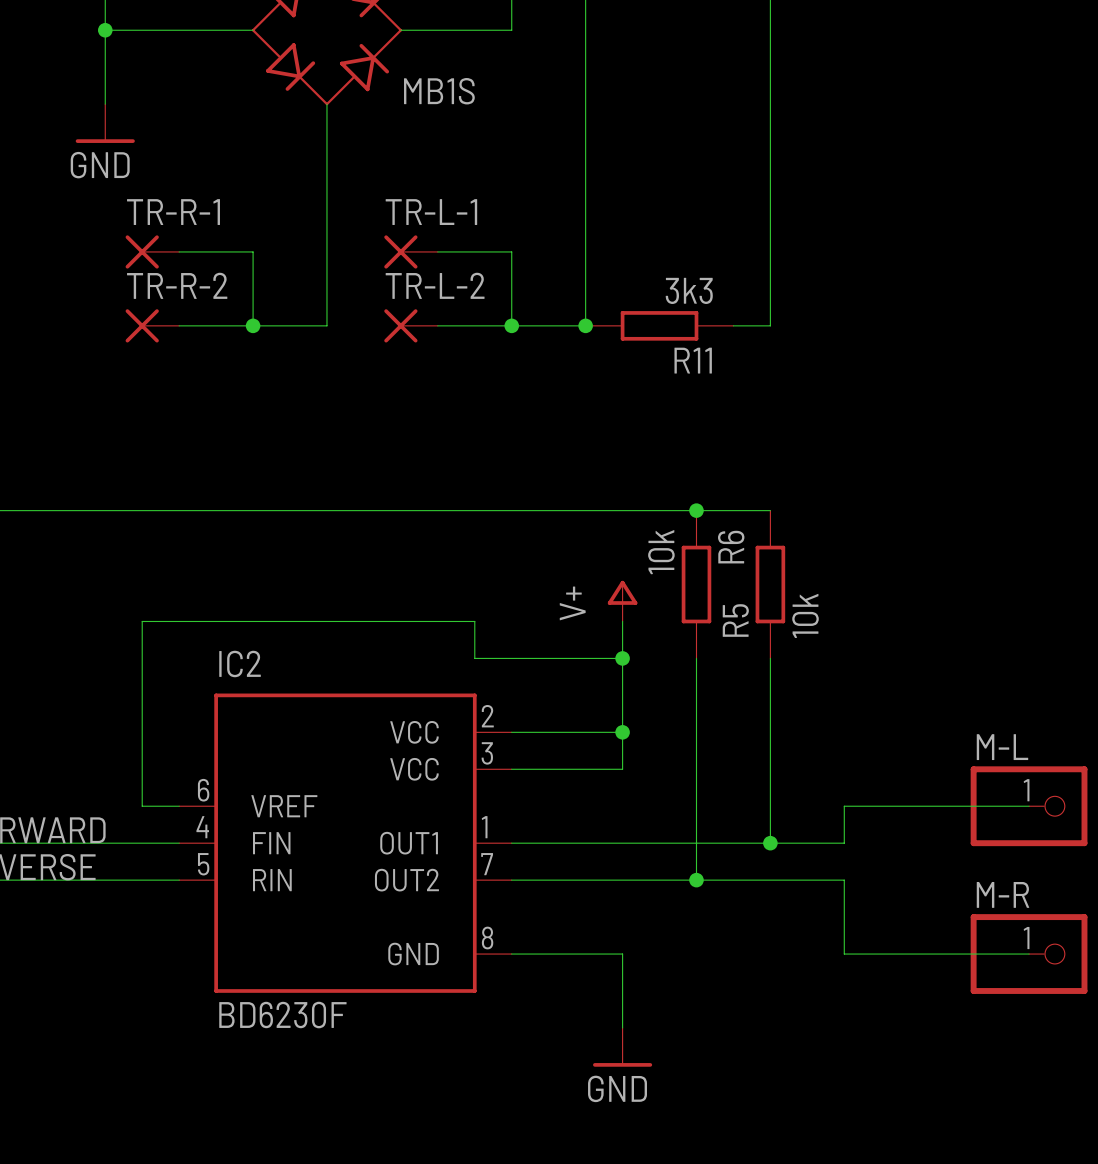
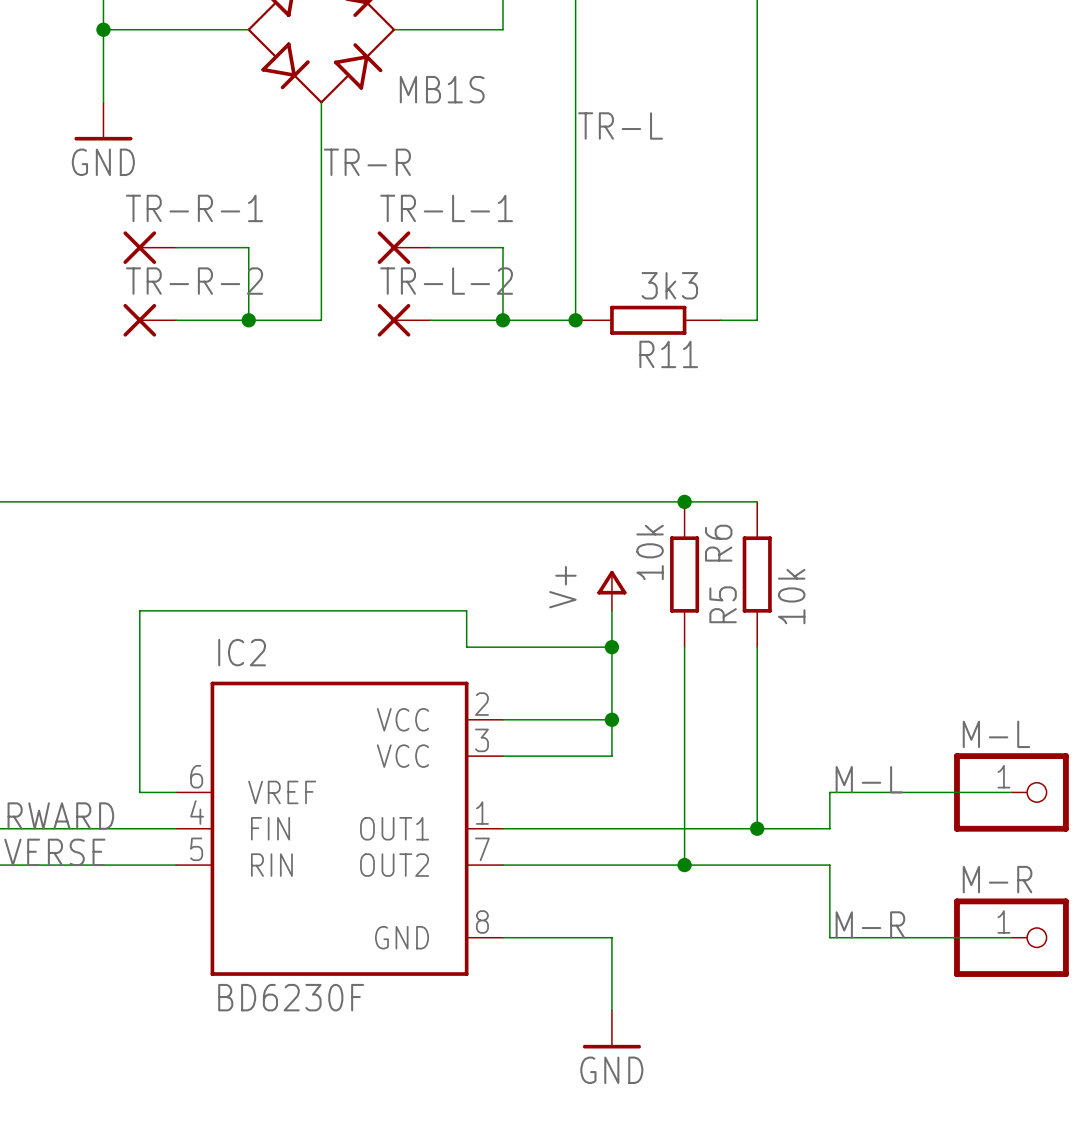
label: none -> TR-L (620, 125)
label: none -> TR-R (367, 162)
label: none -> M-L (869, 779)
label: none -> M-R (870, 925)

